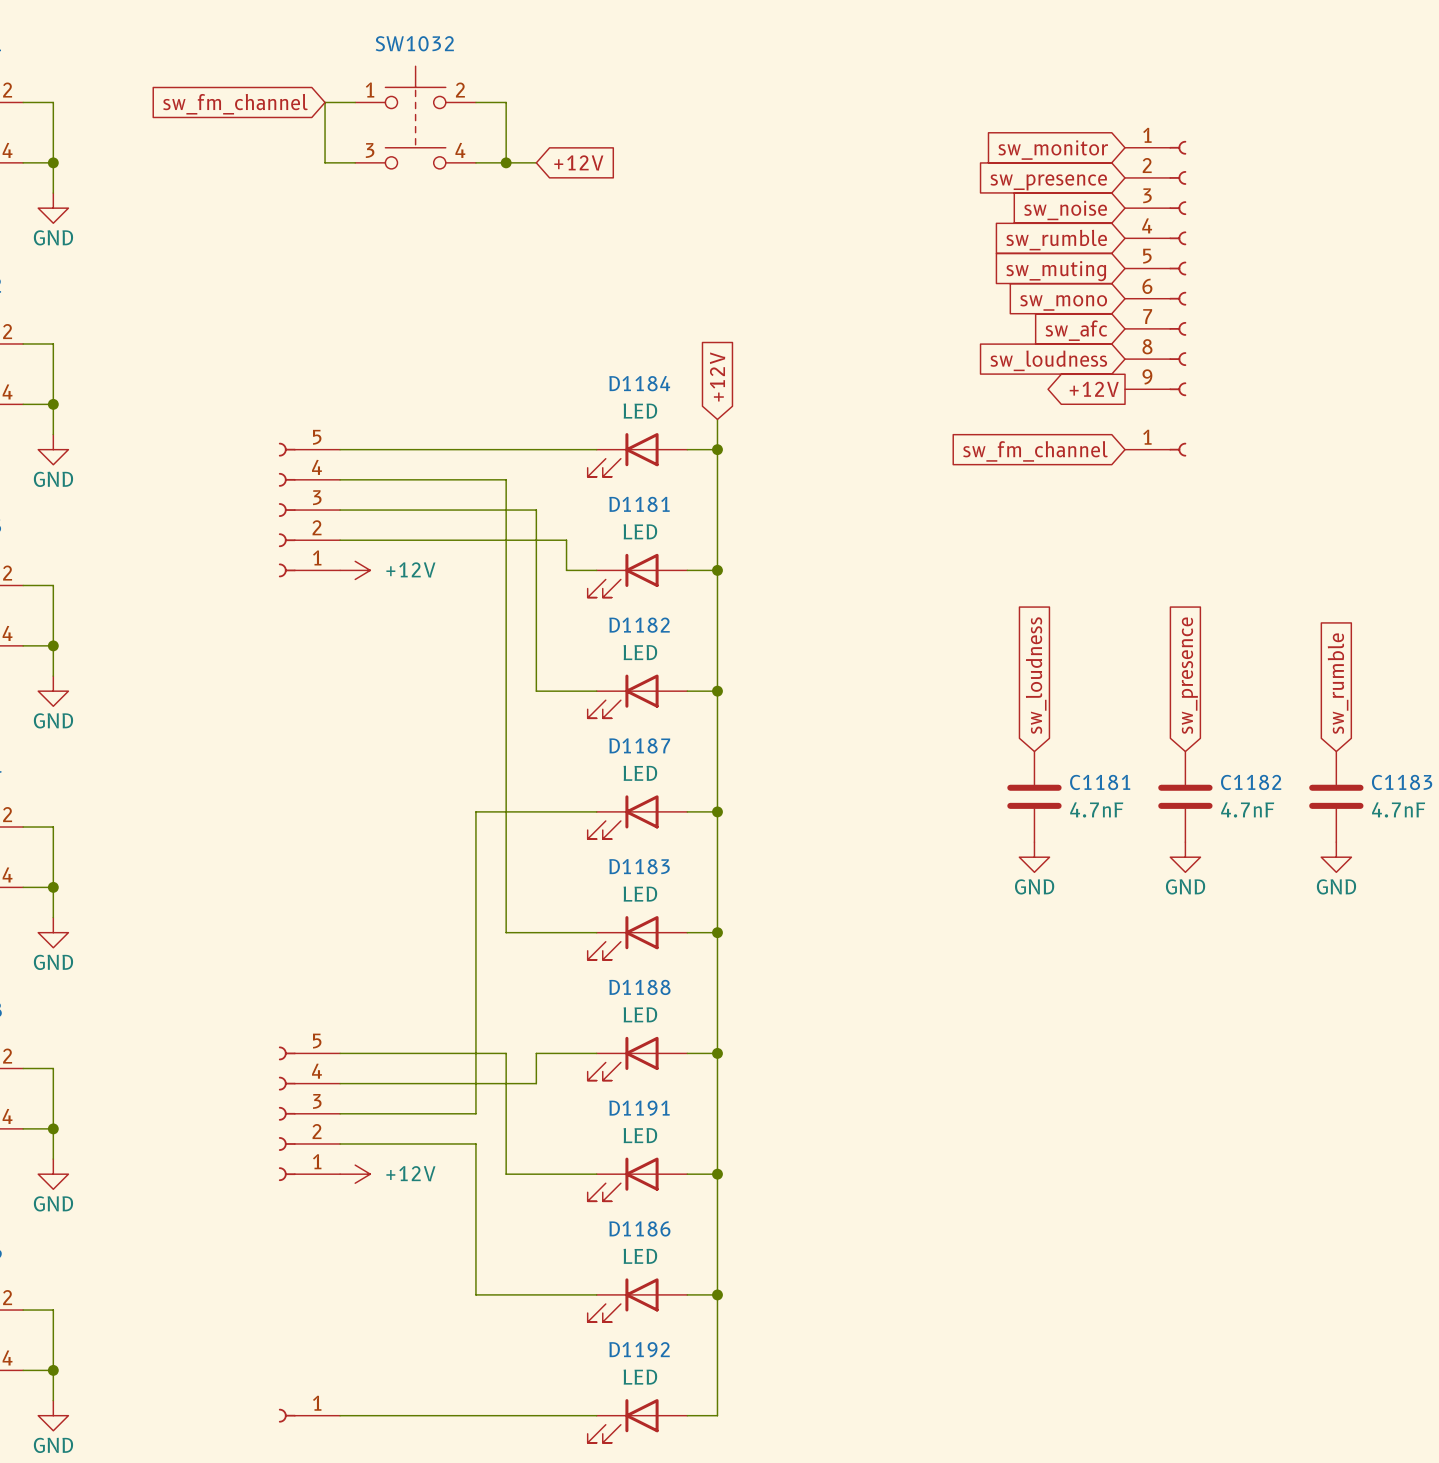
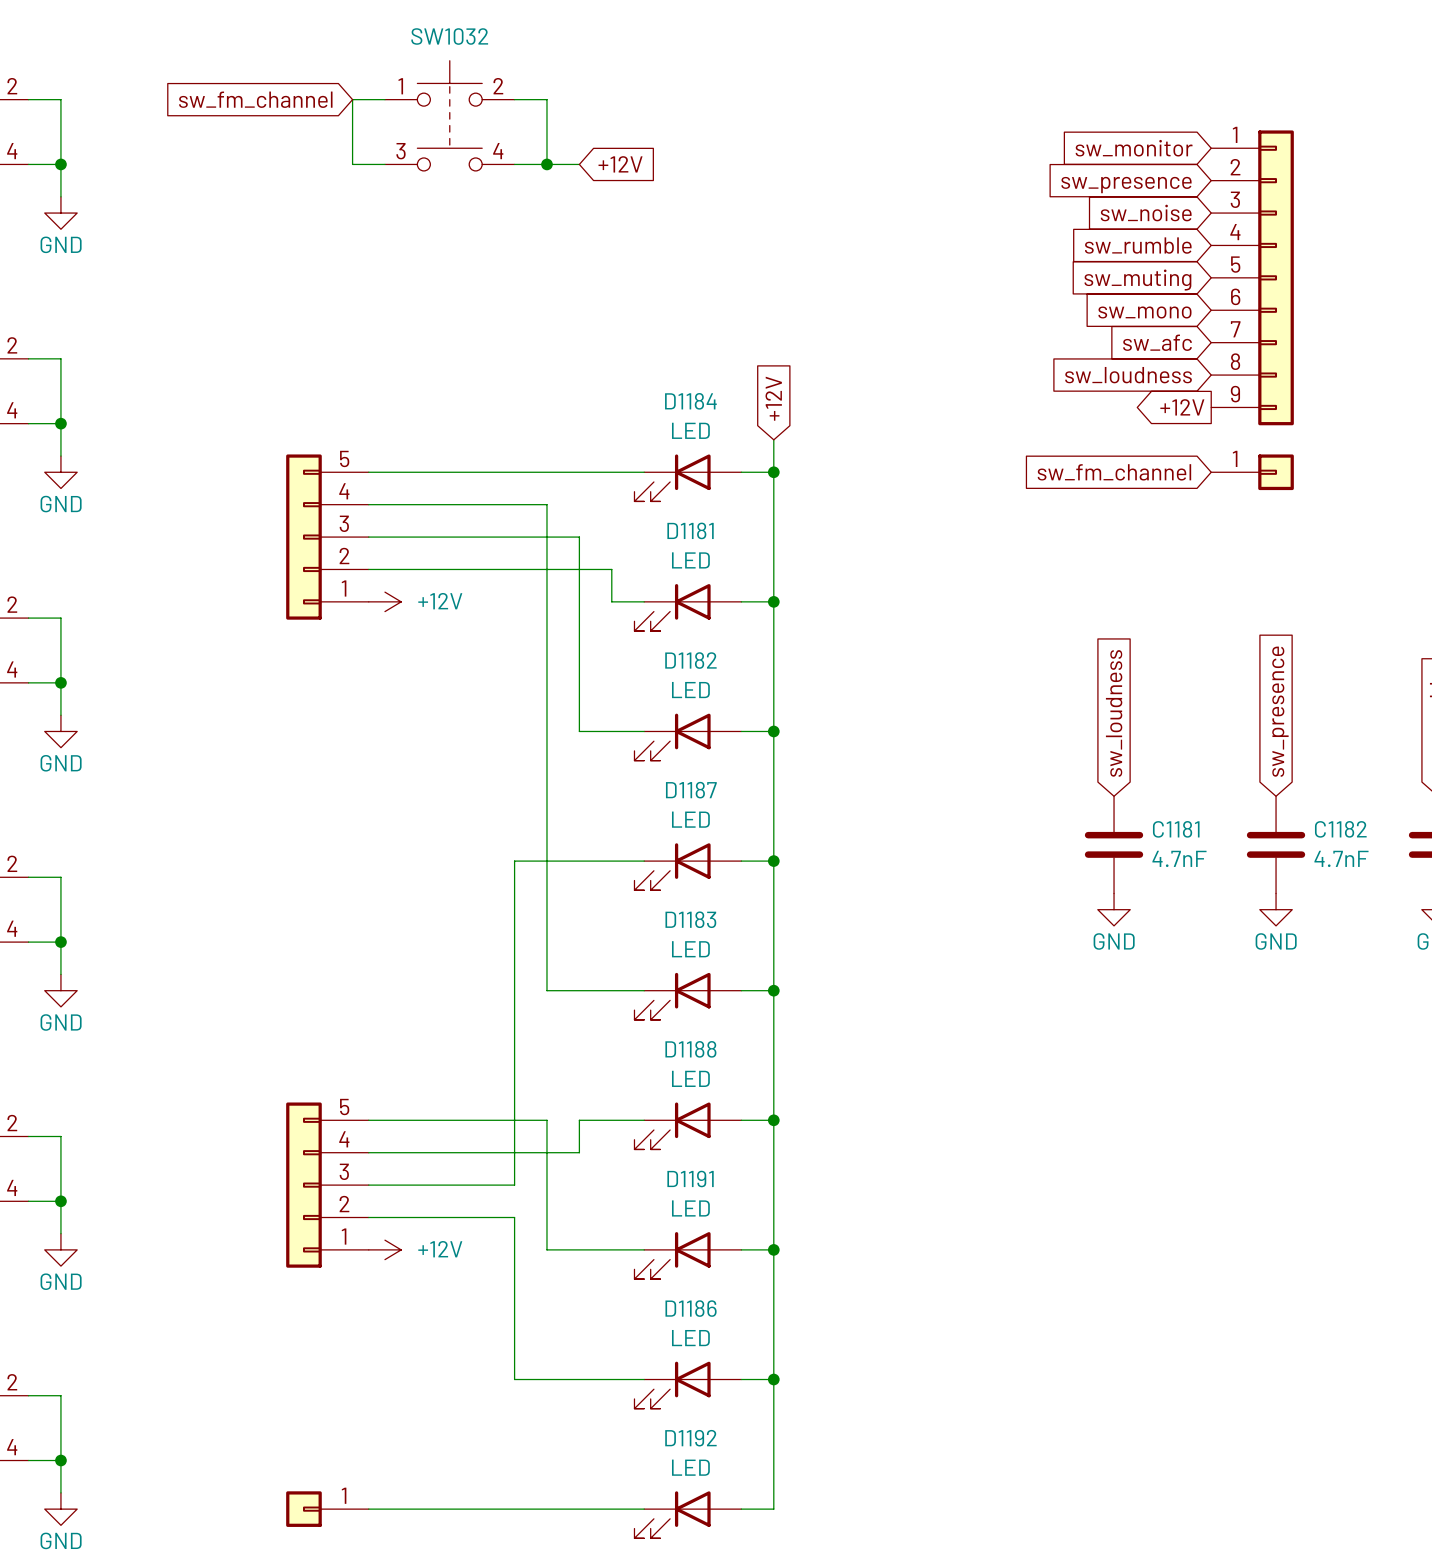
part symbol: [1125, 140, 1187, 397] -> [1211, 130, 1294, 426]
part symbol: [278, 442, 341, 578] -> [286, 454, 369, 620]
part symbol: [1125, 442, 1187, 457] -> [1211, 454, 1294, 491]
part symbol: [278, 1046, 341, 1182] -> [286, 1102, 369, 1268]
part symbol: [278, 1408, 341, 1423] -> [286, 1491, 369, 1527]

